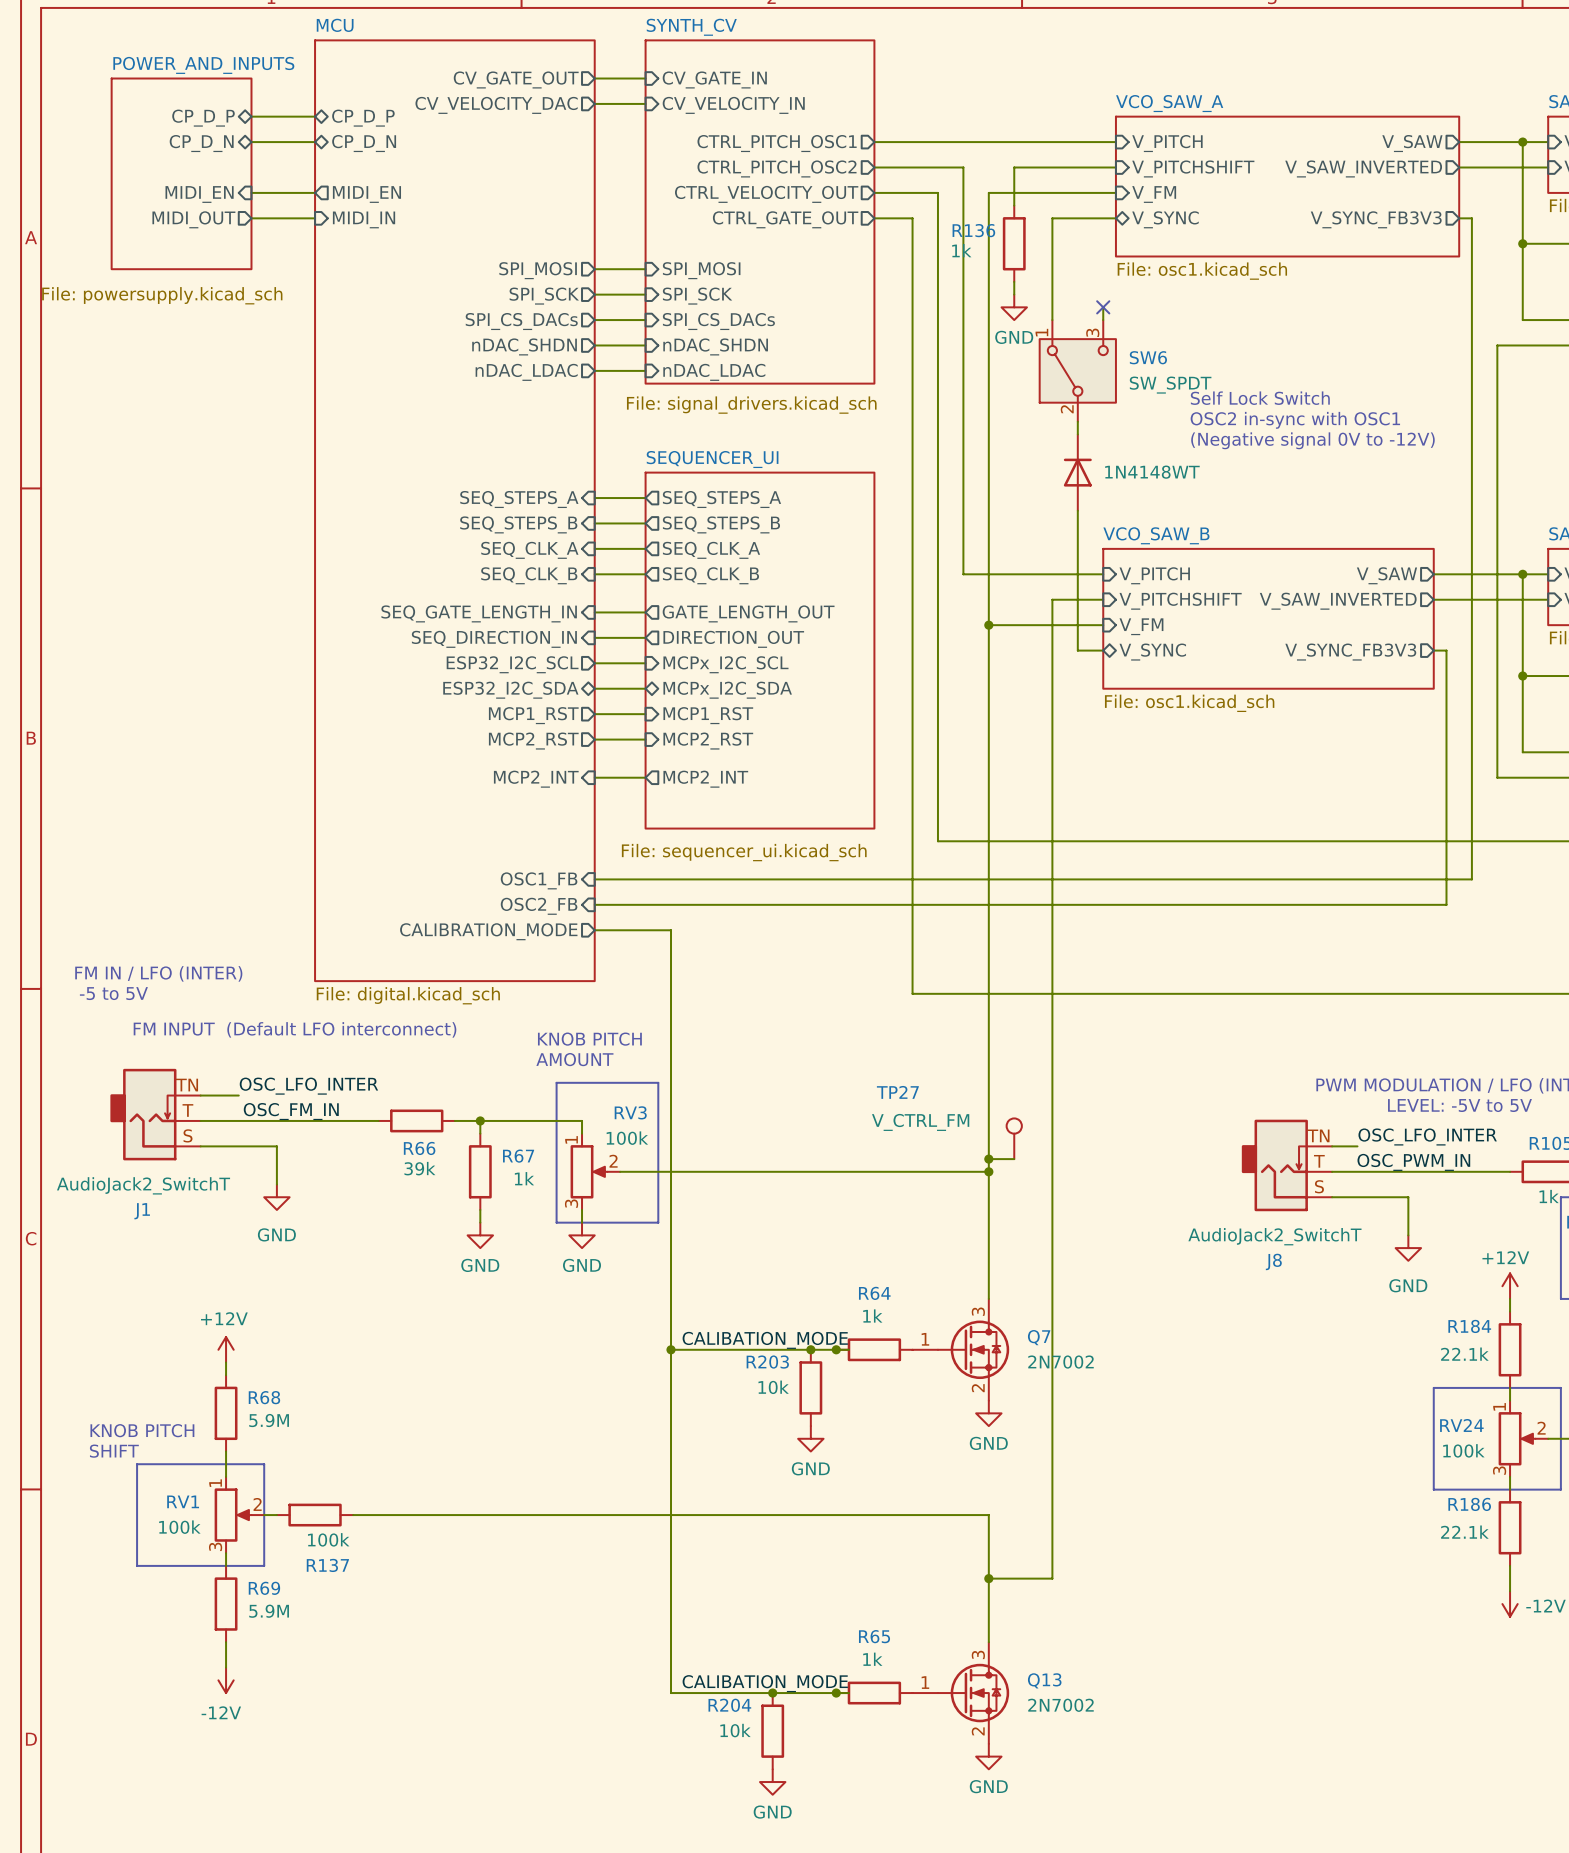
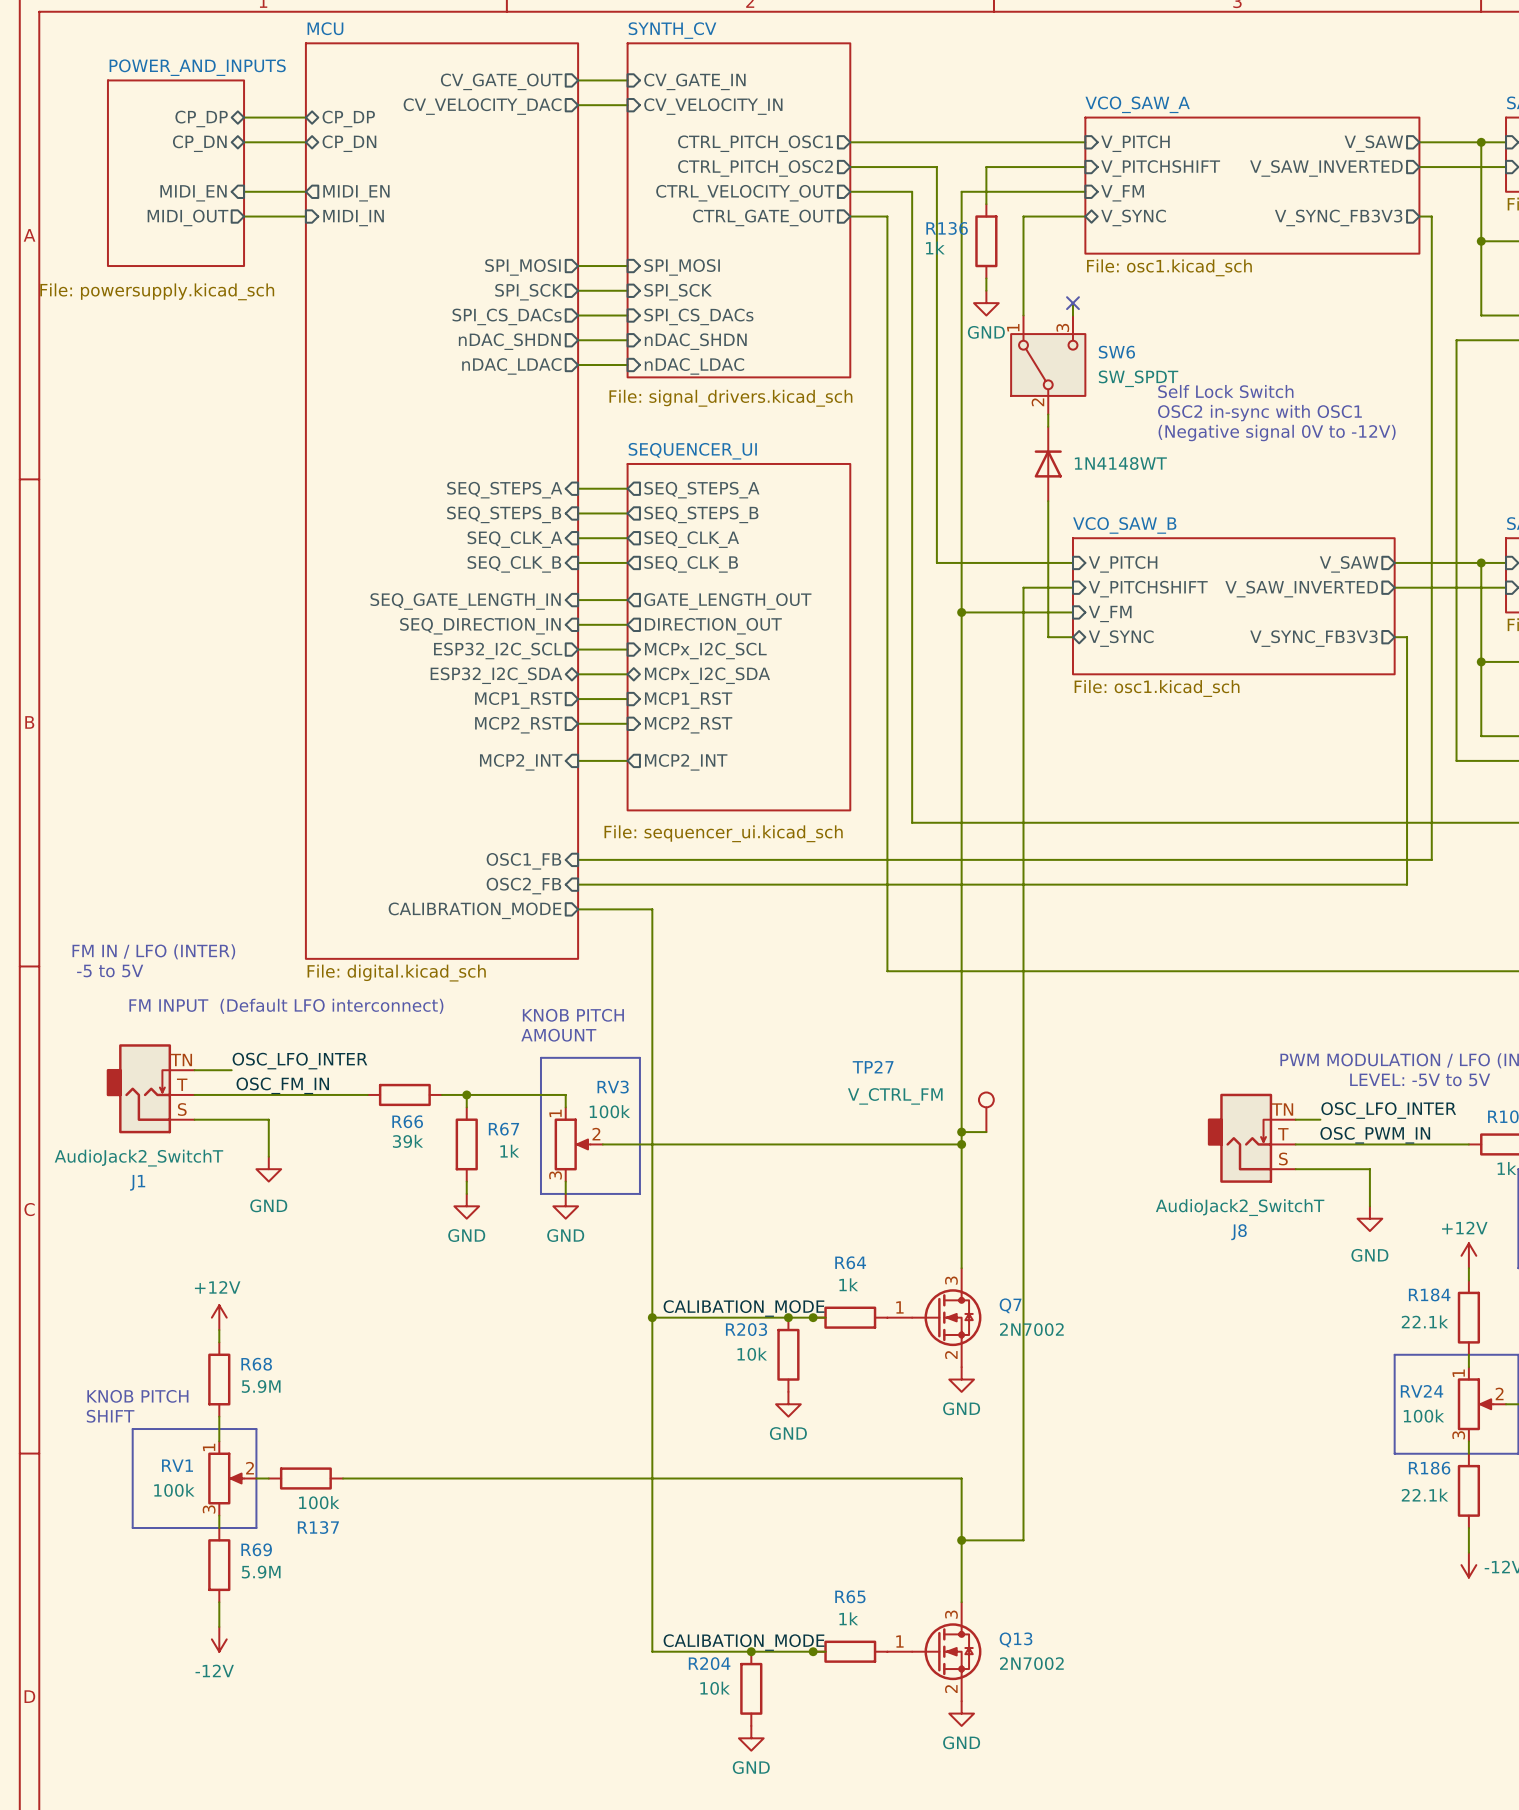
sheet pin: CP_D_P (203, 118) -> CP_DP (201, 118)
sheet pin: CP_D_P (363, 118) -> CP_DP (348, 118)
sheet pin: CP_D_N (201, 143) -> CP_DN (199, 143)
sheet pin: CP_D_N (364, 143) -> CP_DN (349, 143)

